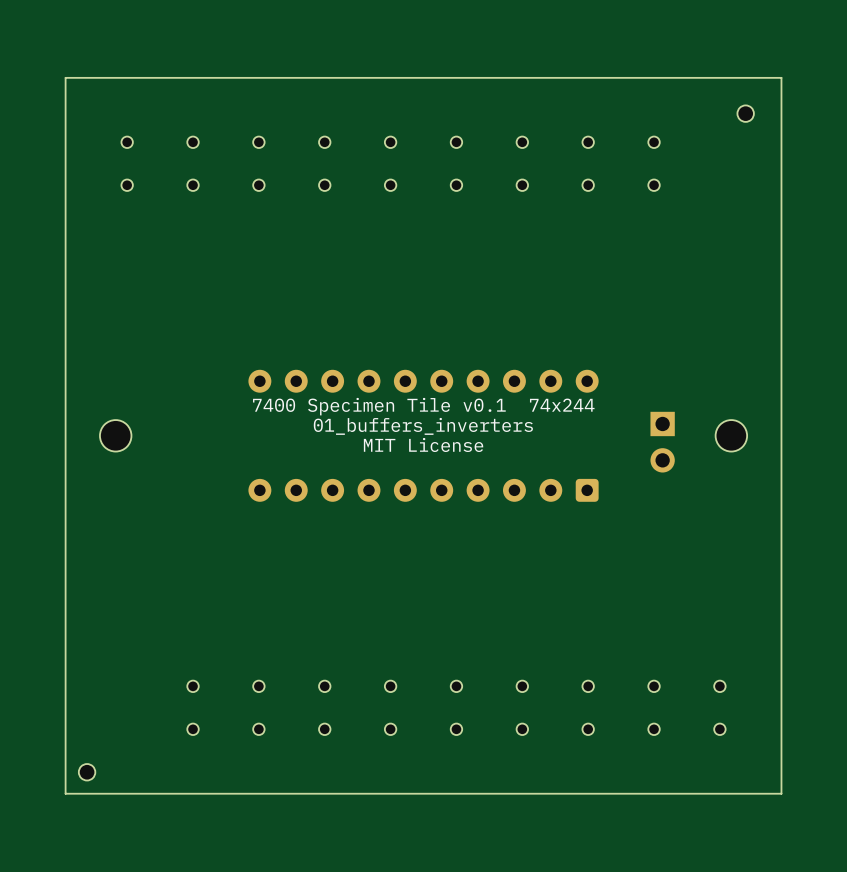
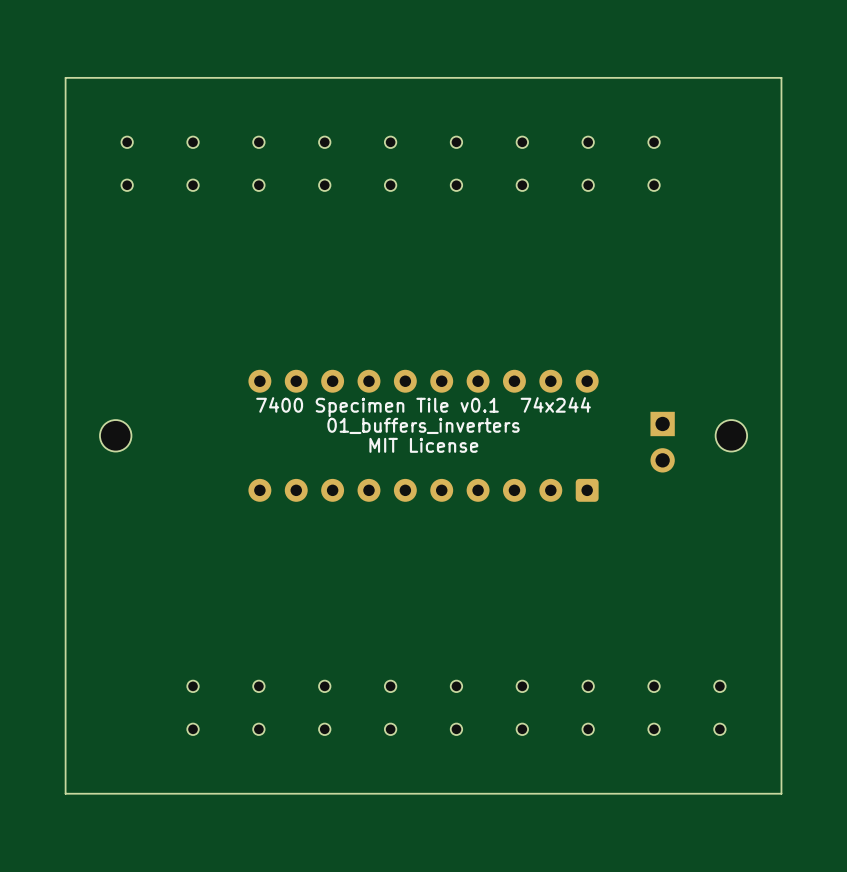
part: (745, 113) -> none
part: (87, 772) -> none

